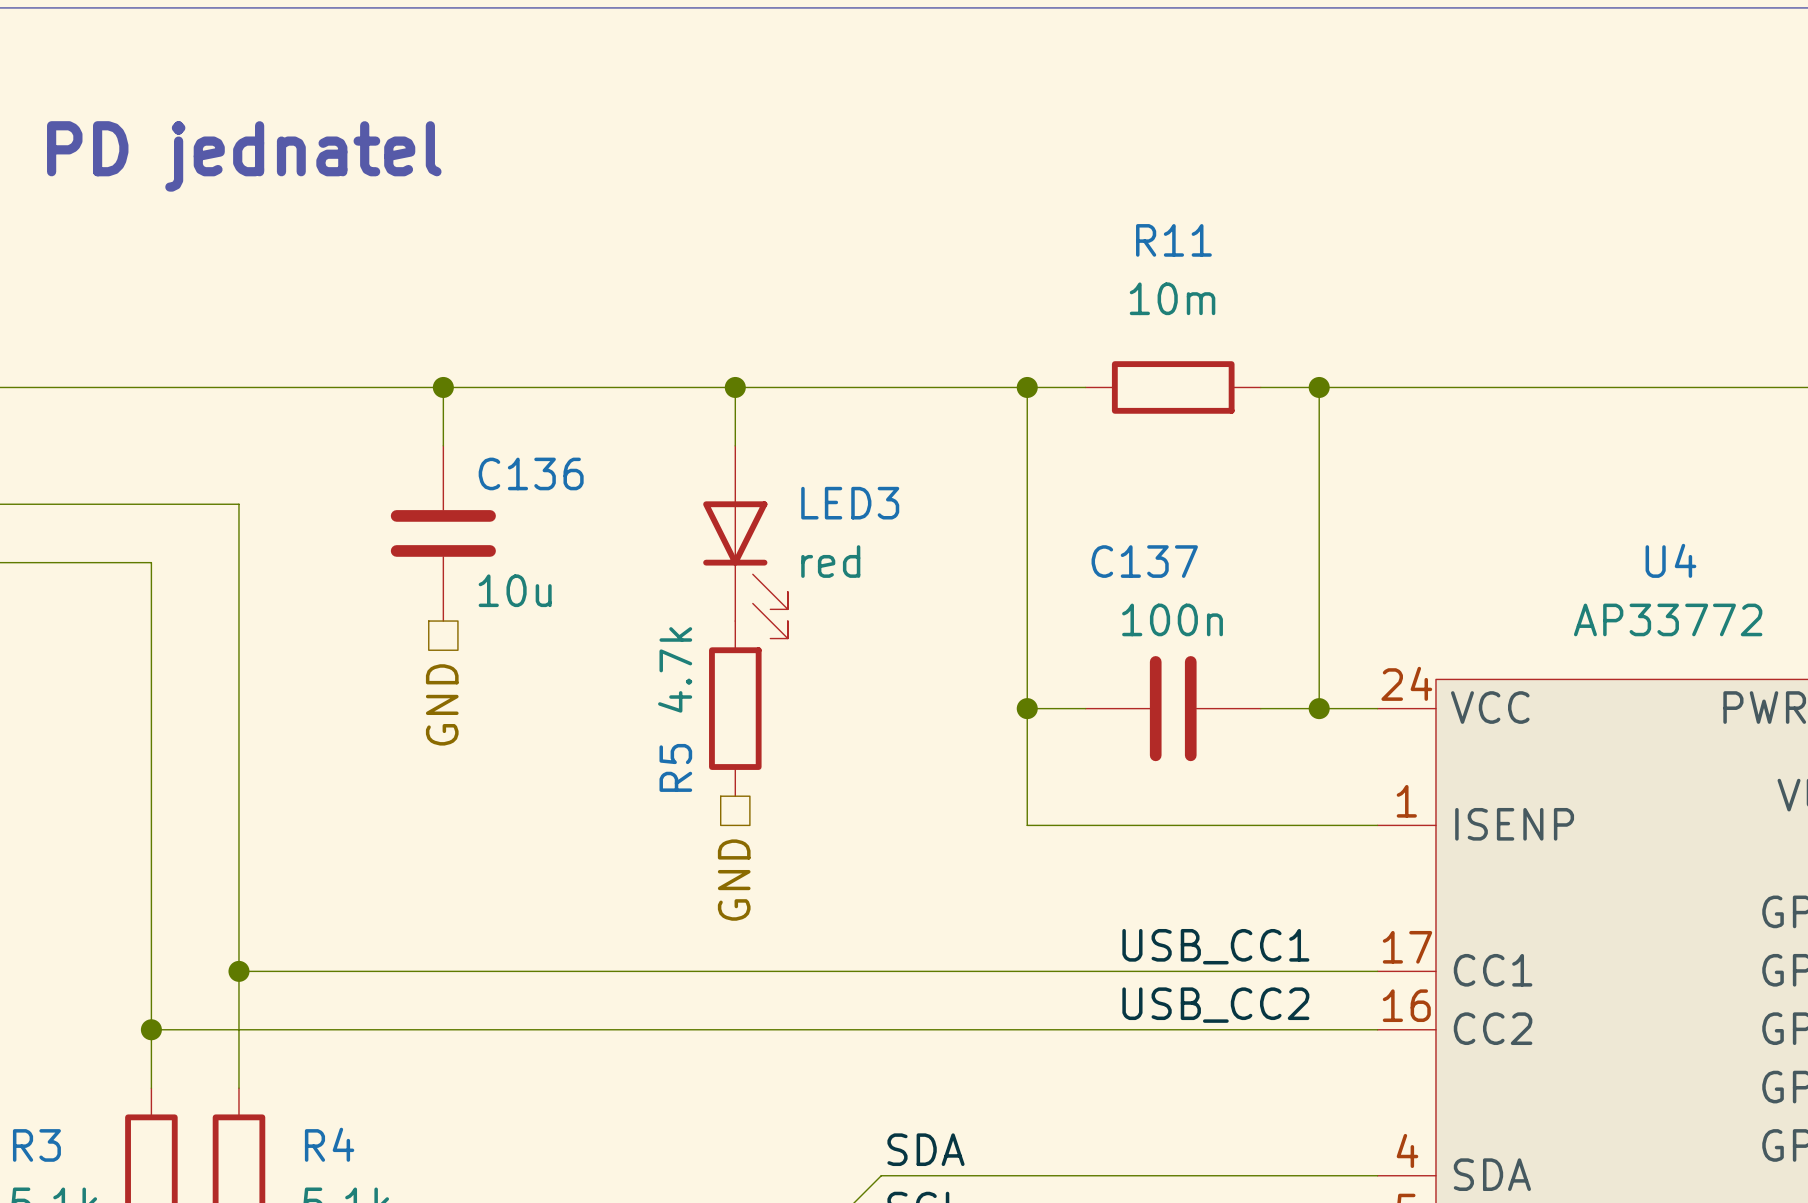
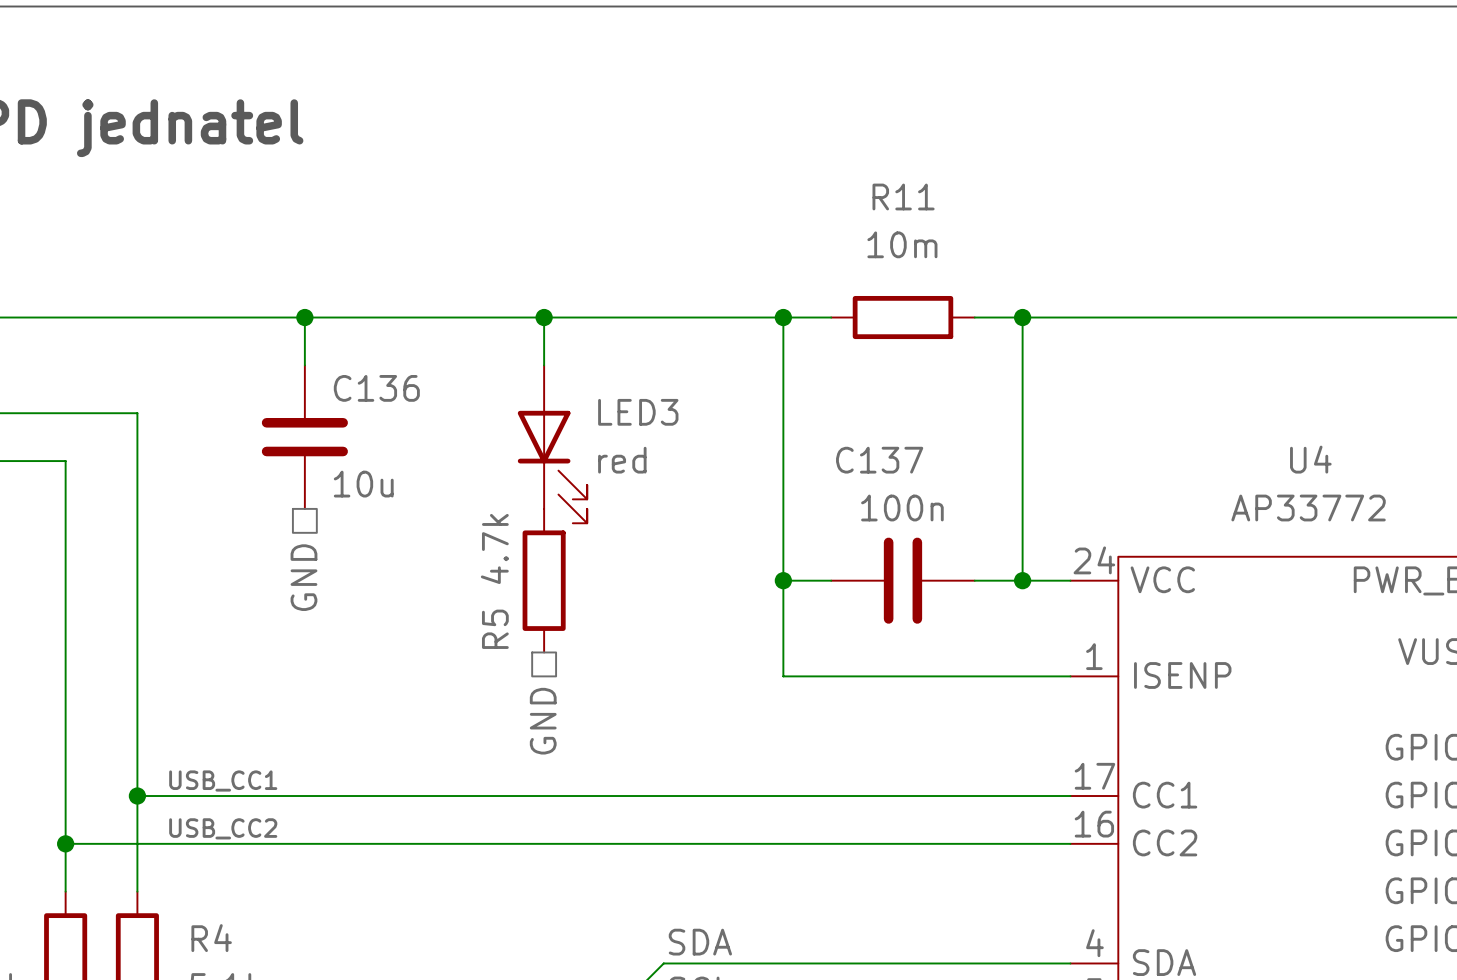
label: USB_CC1 (1215, 946) -> none
label: none -> USB_CC1 (223, 780)
label: USB_CC2 (1215, 1005) -> none
label: none -> USB_CC2 (223, 828)

